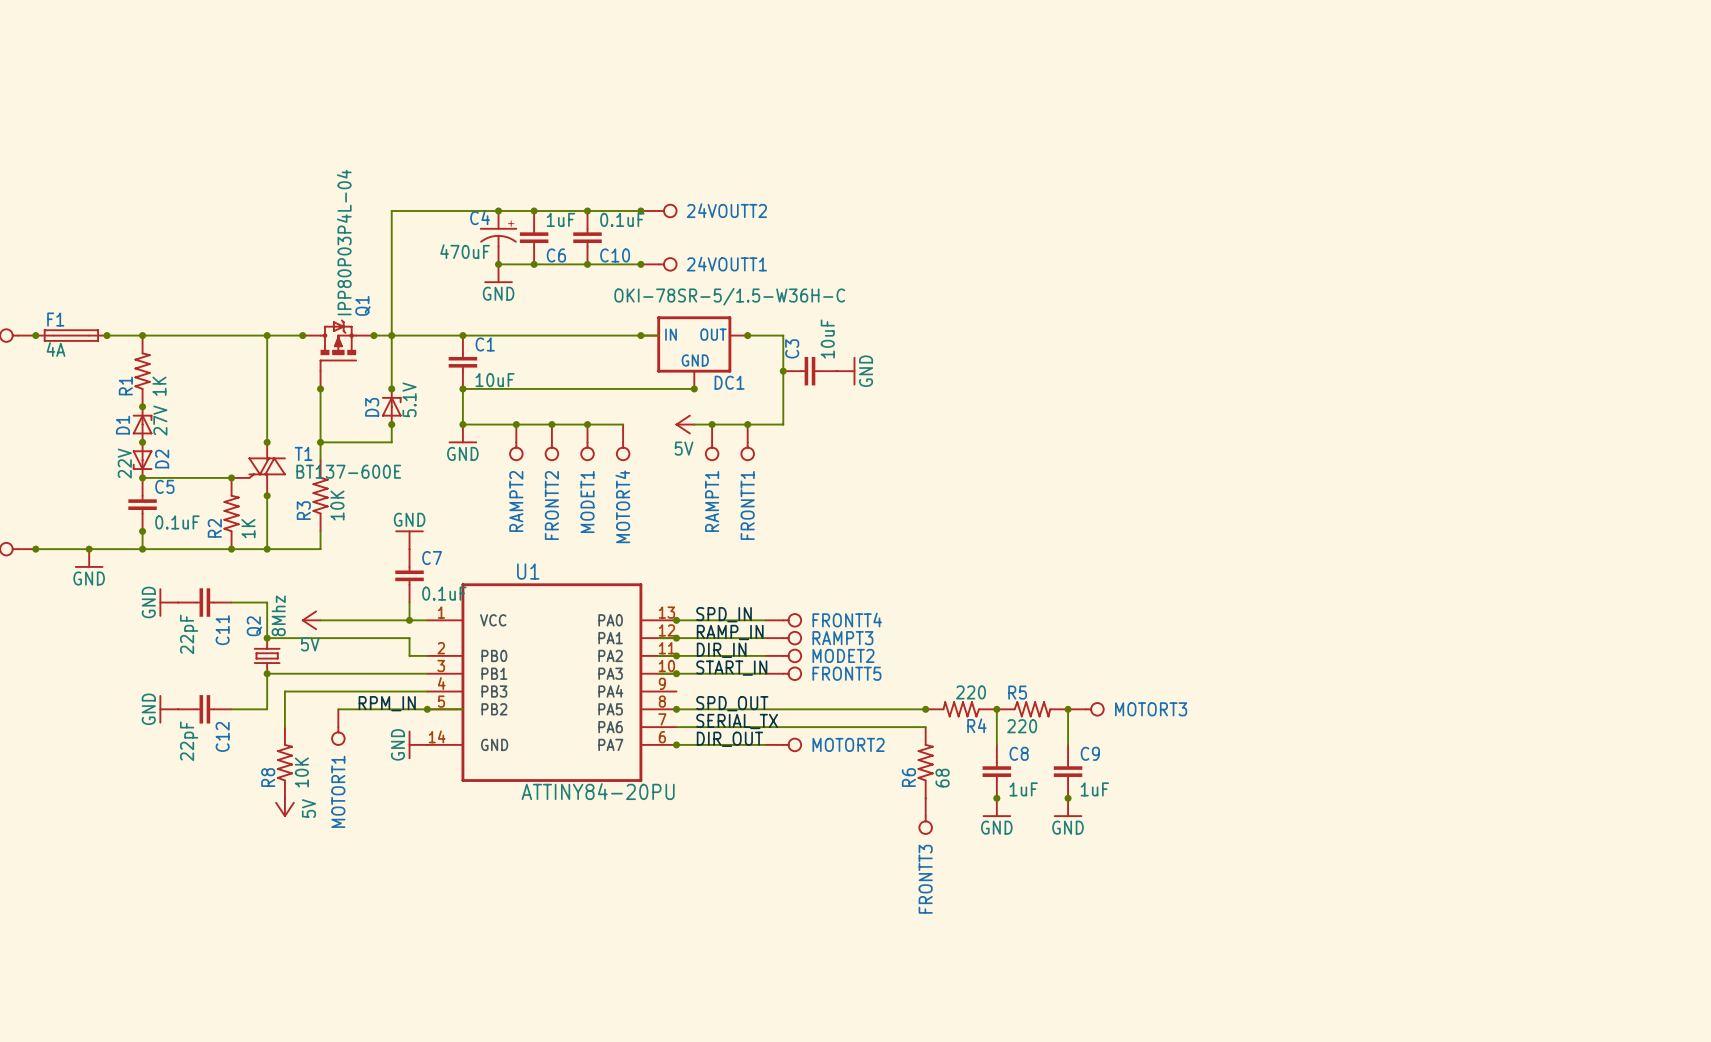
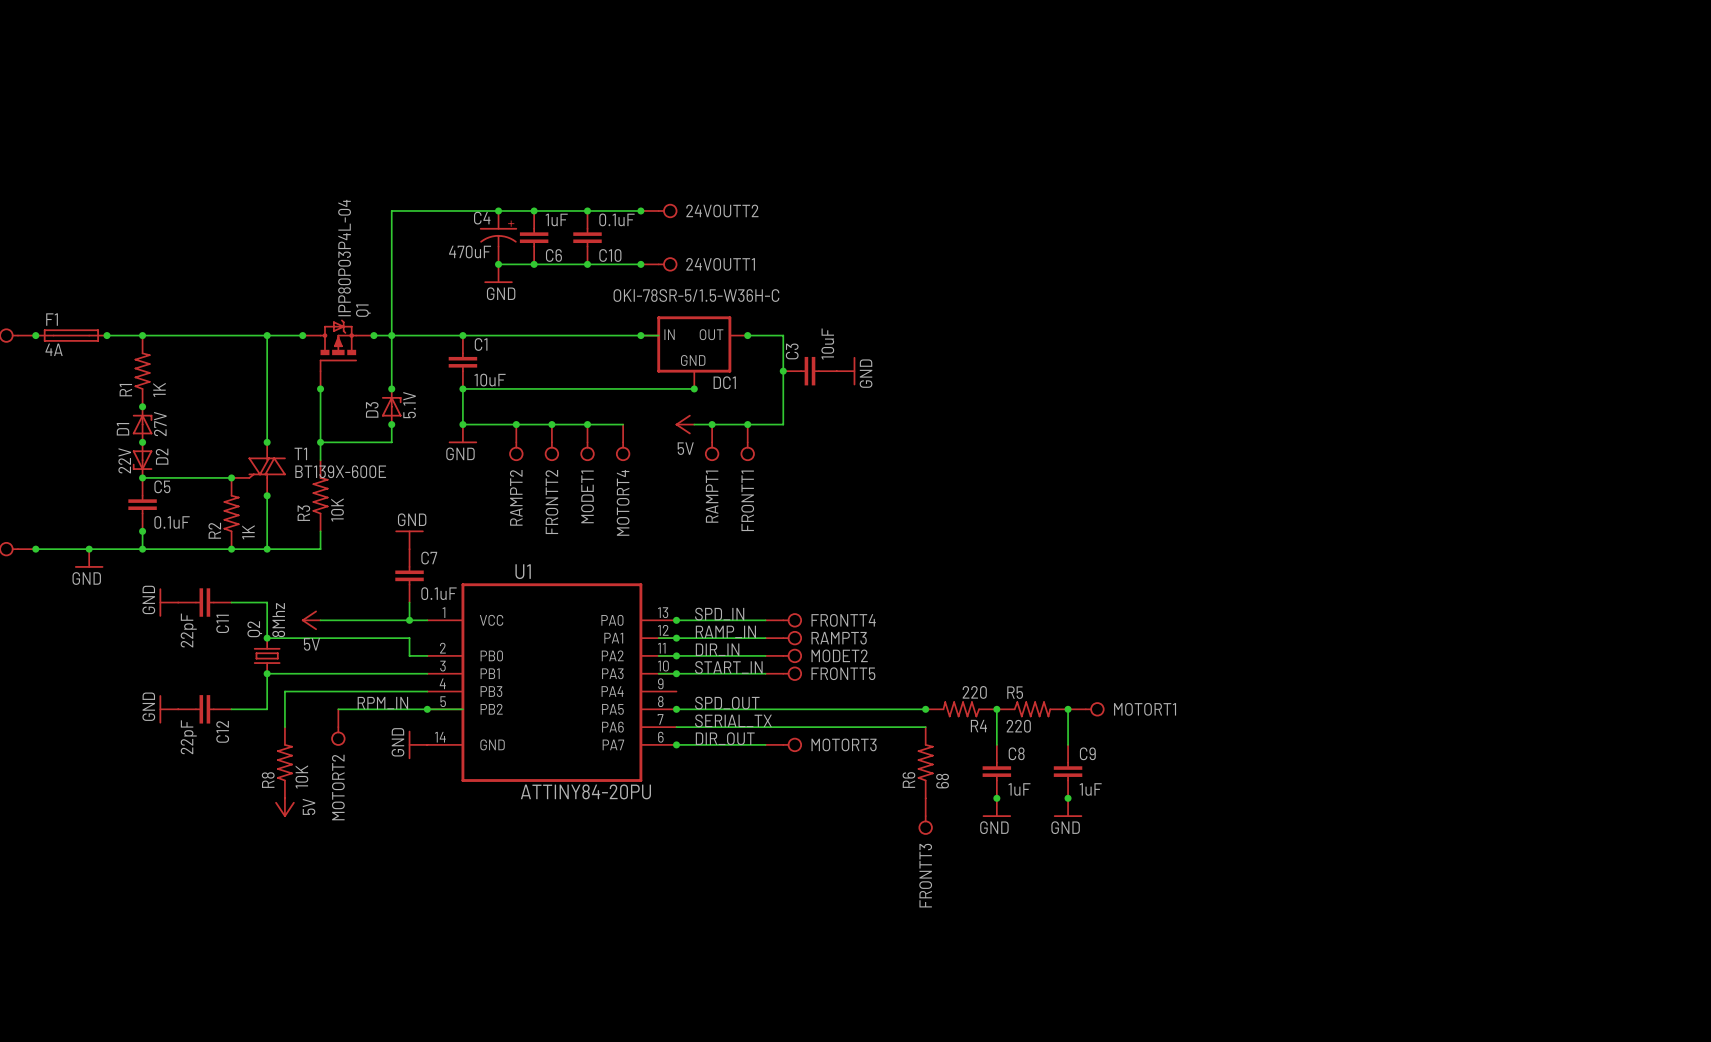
T1 value: BT137-600E (348, 471) -> BT139X-600E (340, 471)
MOTORT3 name: MOTORT3 (1151, 709) -> MOTORT1 (1145, 709)
MOTORT2 name: MOTORT2 (848, 744) -> MOTORT3 (844, 744)
MOTORT1 name: MOTORT1 (338, 791) -> MOTORT2 (338, 787)

